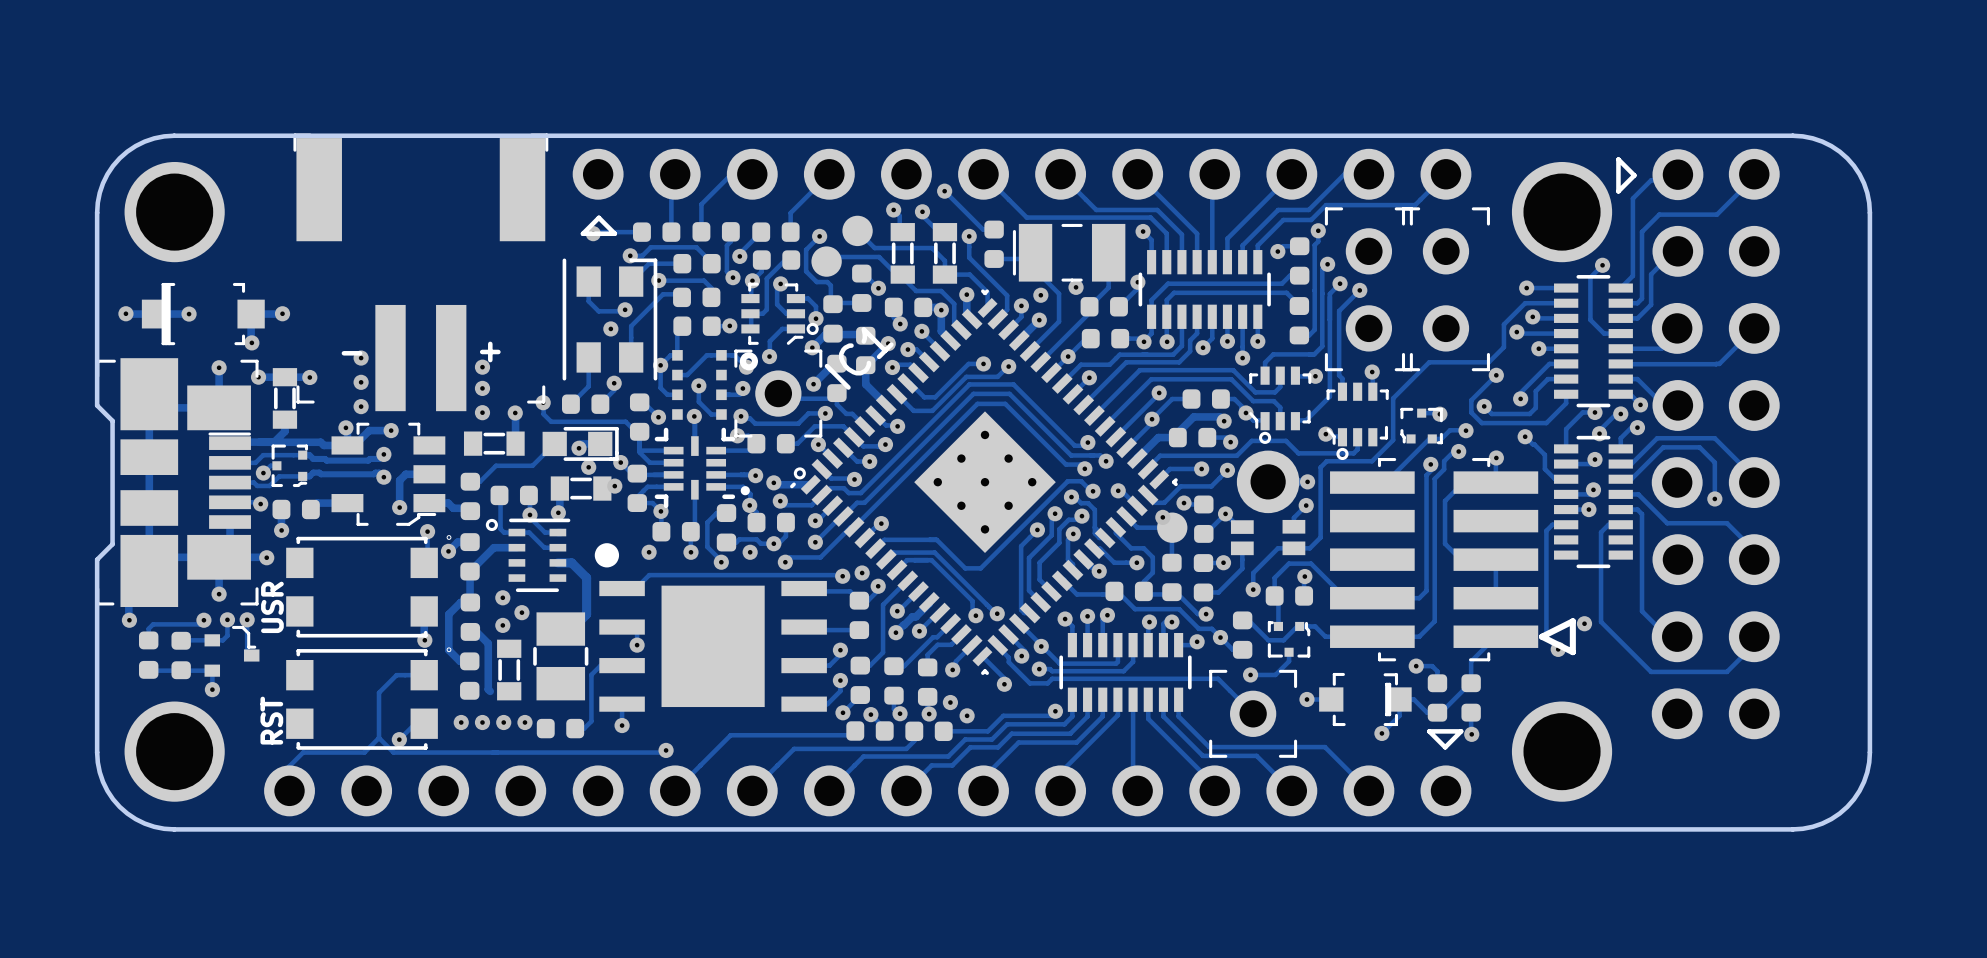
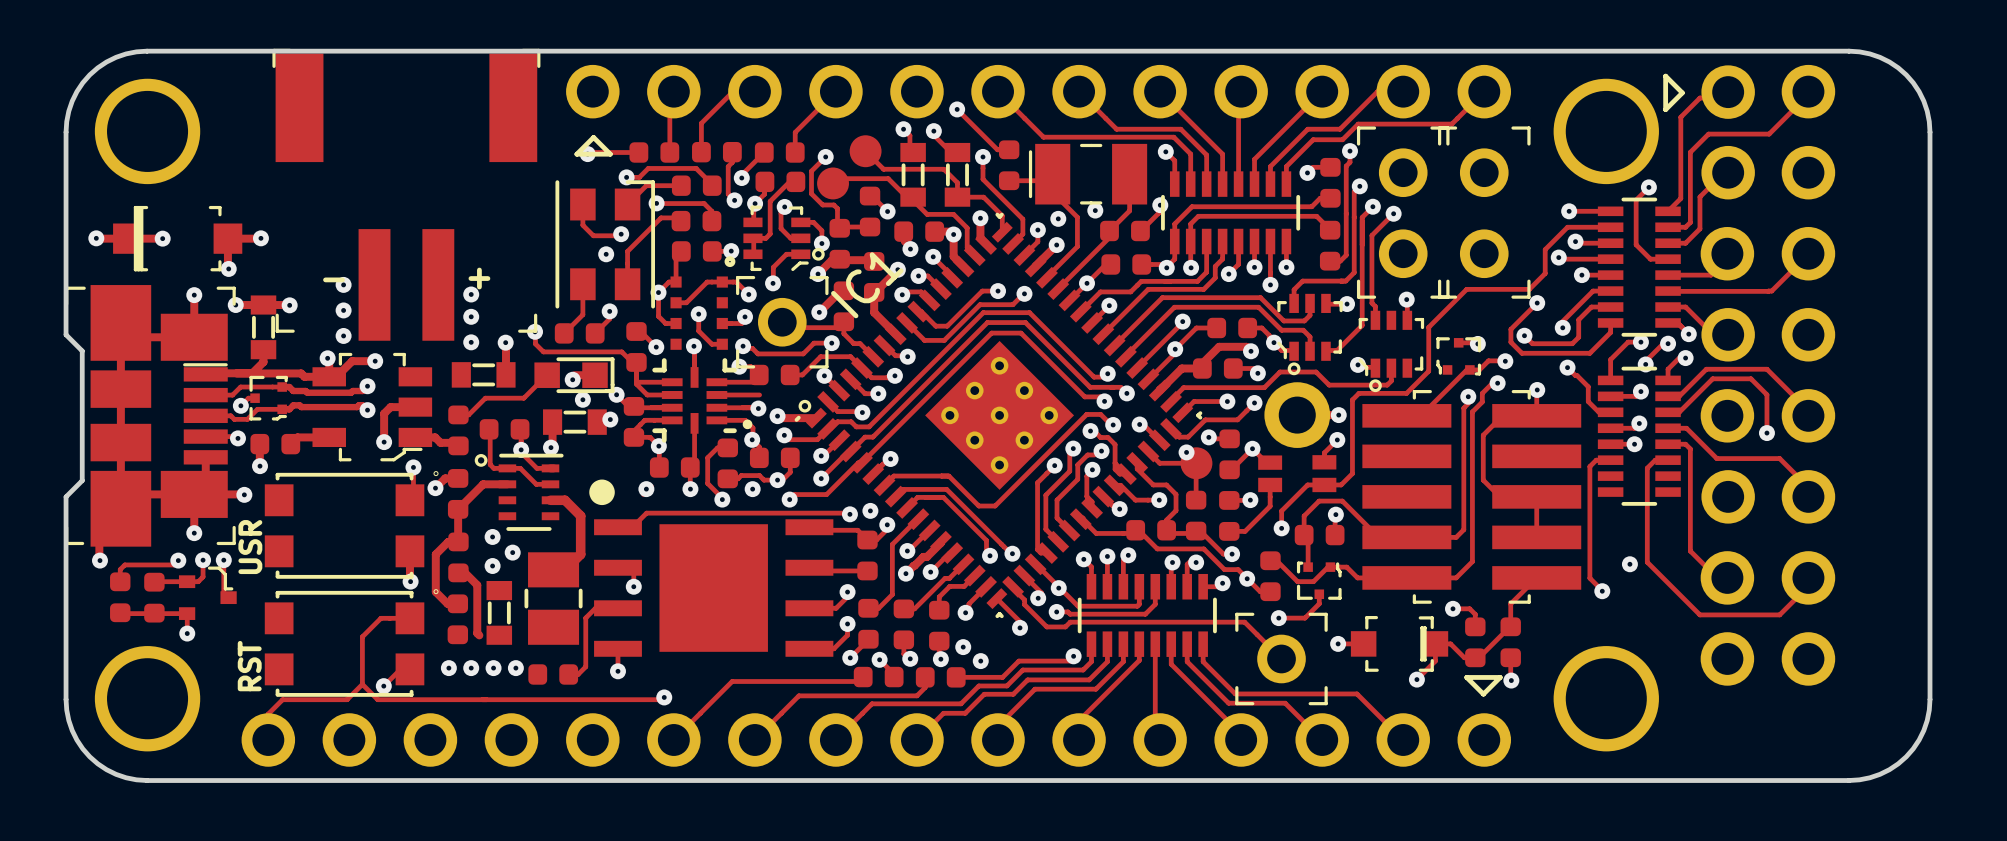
part footprint: [672, 350, 759, 420] -> [670, 256, 736, 350]
part footprint: [1330, 458, 1576, 662] -> [1362, 390, 1582, 604]
track: none -> (716, 394) (759, 394)

